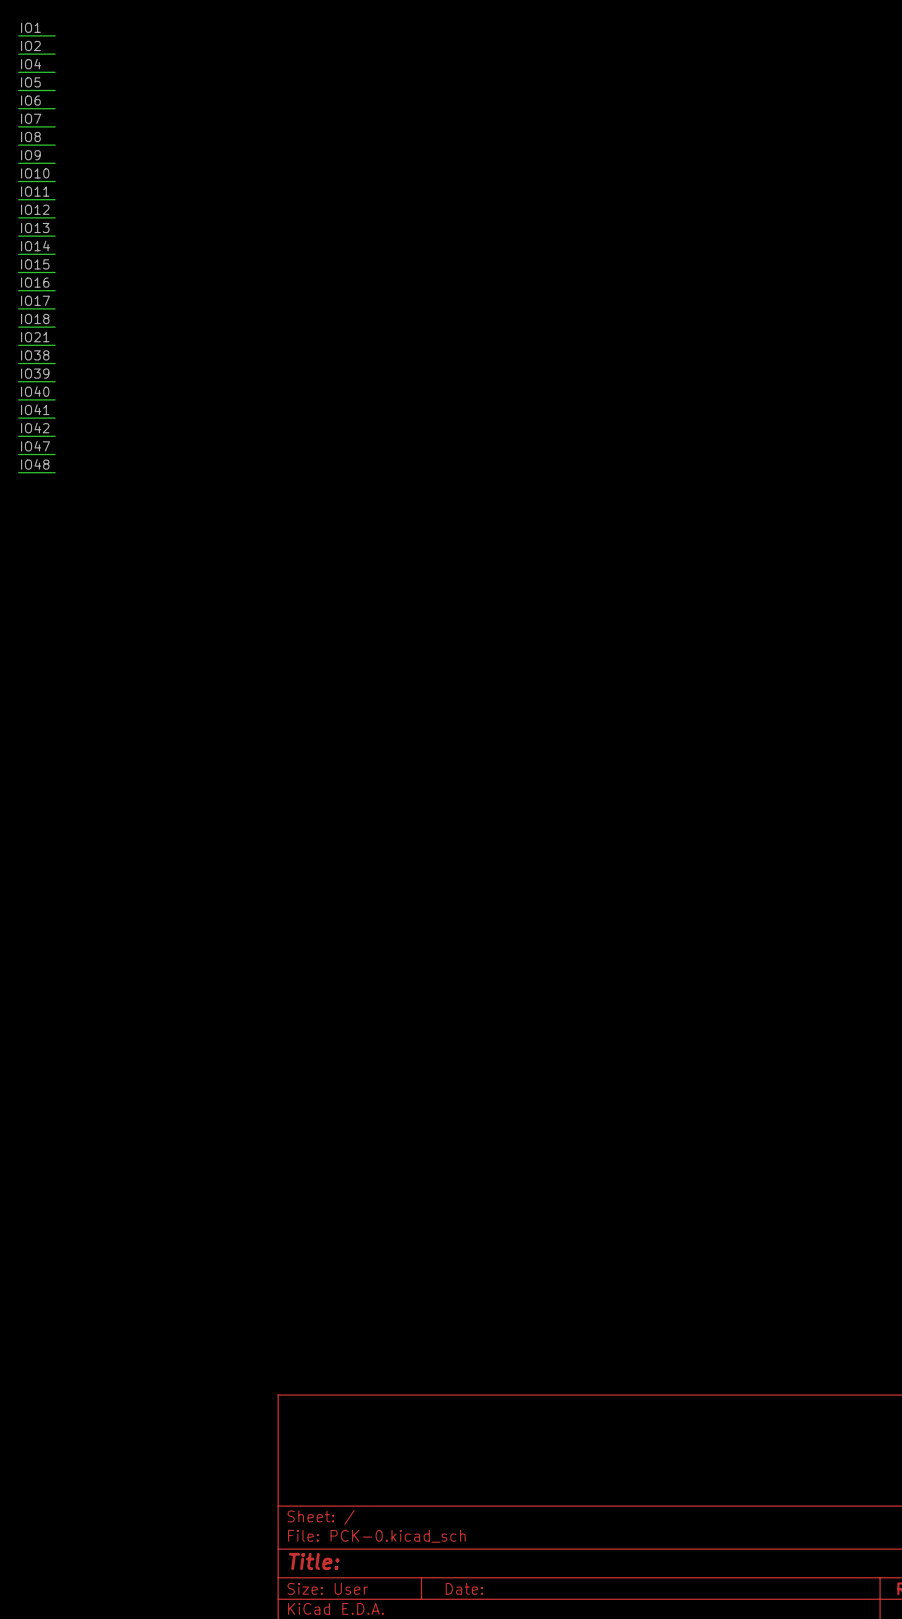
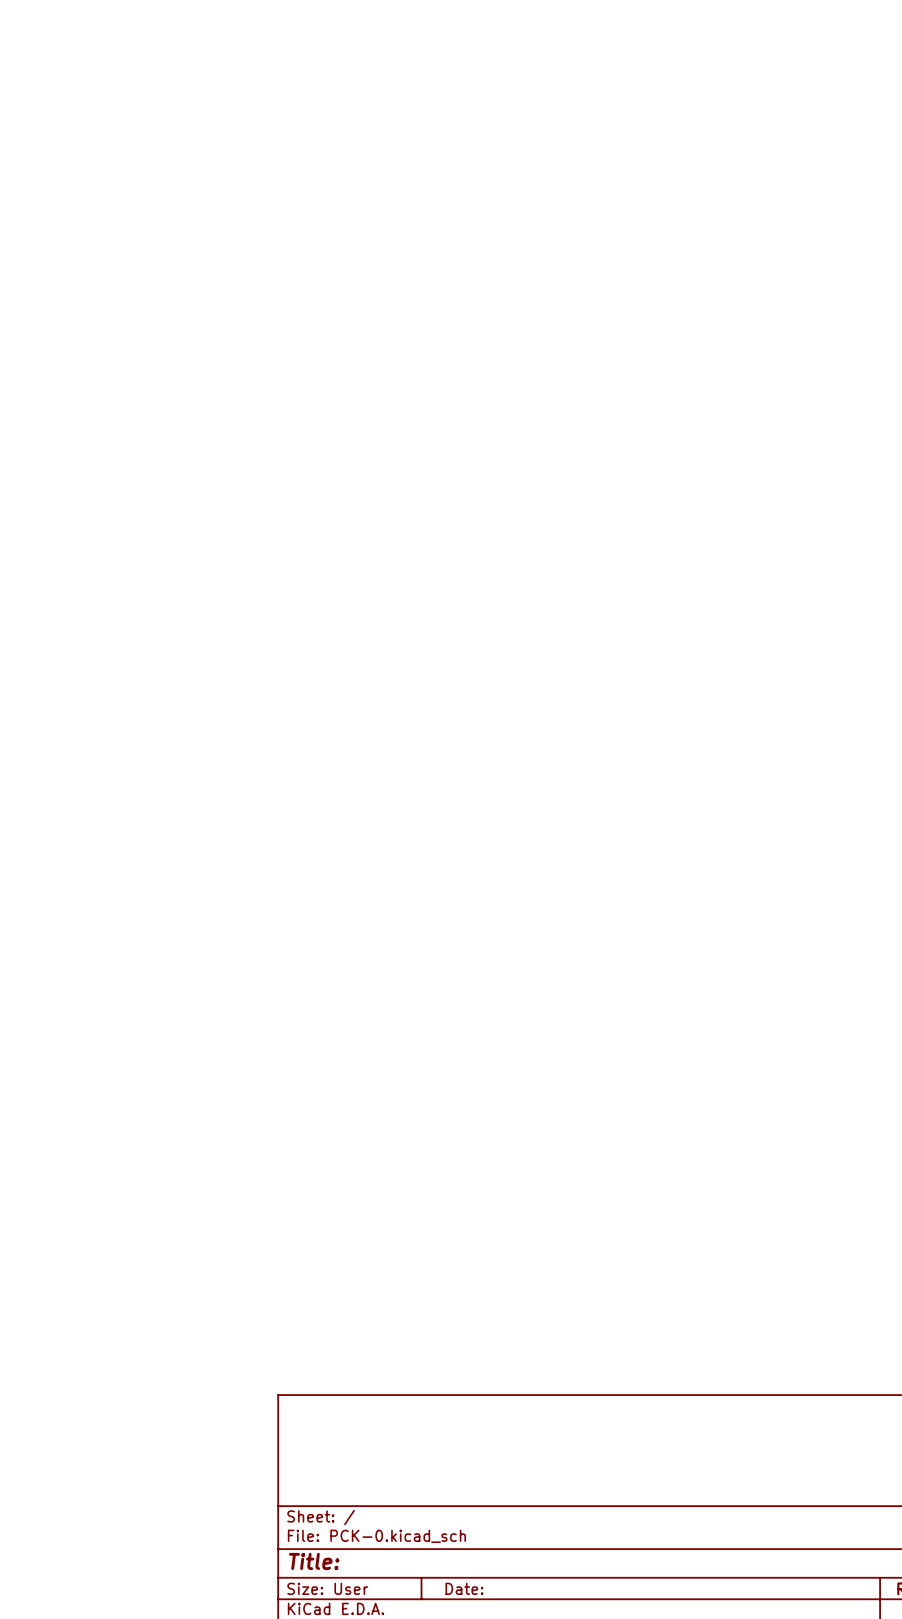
label: IO1 (30, 27) -> none
wire: (18, 35) (55, 35) -> none
label: IO2 (30, 45) -> none
wire: (18, 54) (55, 54) -> none
label: IO4 (31, 63) -> none
wire: (18, 72) (55, 72) -> none
label: IO5 (30, 82) -> none
wire: (18, 90) (55, 90) -> none
label: IO6 (30, 100) -> none
wire: (18, 108) (55, 108) -> none
label: IO7 (31, 118) -> none
wire: (18, 126) (55, 126) -> none
label: IO8 (30, 136) -> none
wire: (18, 145) (55, 145) -> none
label: IO9 (30, 155) -> none
wire: (18, 163) (55, 163) -> none
label: IO10 (35, 173) -> none
wire: (18, 181) (55, 181) -> none
label: IO11 (35, 191) -> none
wire: (18, 199) (55, 199) -> none
label: IO12 (35, 209) -> none
wire: (18, 217) (55, 217) -> none
label: IO13 (35, 227) -> none
wire: (18, 236) (55, 236) -> none
label: IO14 (35, 245) -> none
wire: (18, 254) (55, 254) -> none
label: IO15 (35, 264) -> none
wire: (18, 272) (55, 272) -> none
label: IO16 (35, 282) -> none
wire: (18, 290) (55, 290) -> none
label: IO17 (35, 300) -> none
wire: (18, 308) (55, 308) -> none
label: IO18 (35, 318) -> none
wire: (18, 327) (55, 327) -> none
label: IO21 (35, 337) -> none
wire: (18, 345) (55, 345) -> none
label: IO38 (35, 355) -> none
wire: (18, 363) (55, 363) -> none
label: IO39 (35, 373) -> none
wire: (18, 381) (55, 381) -> none
label: IO40 (35, 391) -> none
wire: (18, 399) (55, 399) -> none
label: IO41 (35, 409) -> none
wire: (18, 418) (55, 418) -> none
label: IO42 (35, 427) -> none
wire: (18, 436) (55, 436) -> none
label: IO47 (35, 446) -> none
wire: (18, 454) (55, 454) -> none
label: IO48 (35, 464) -> none
wire: (18, 472) (55, 472) -> none

